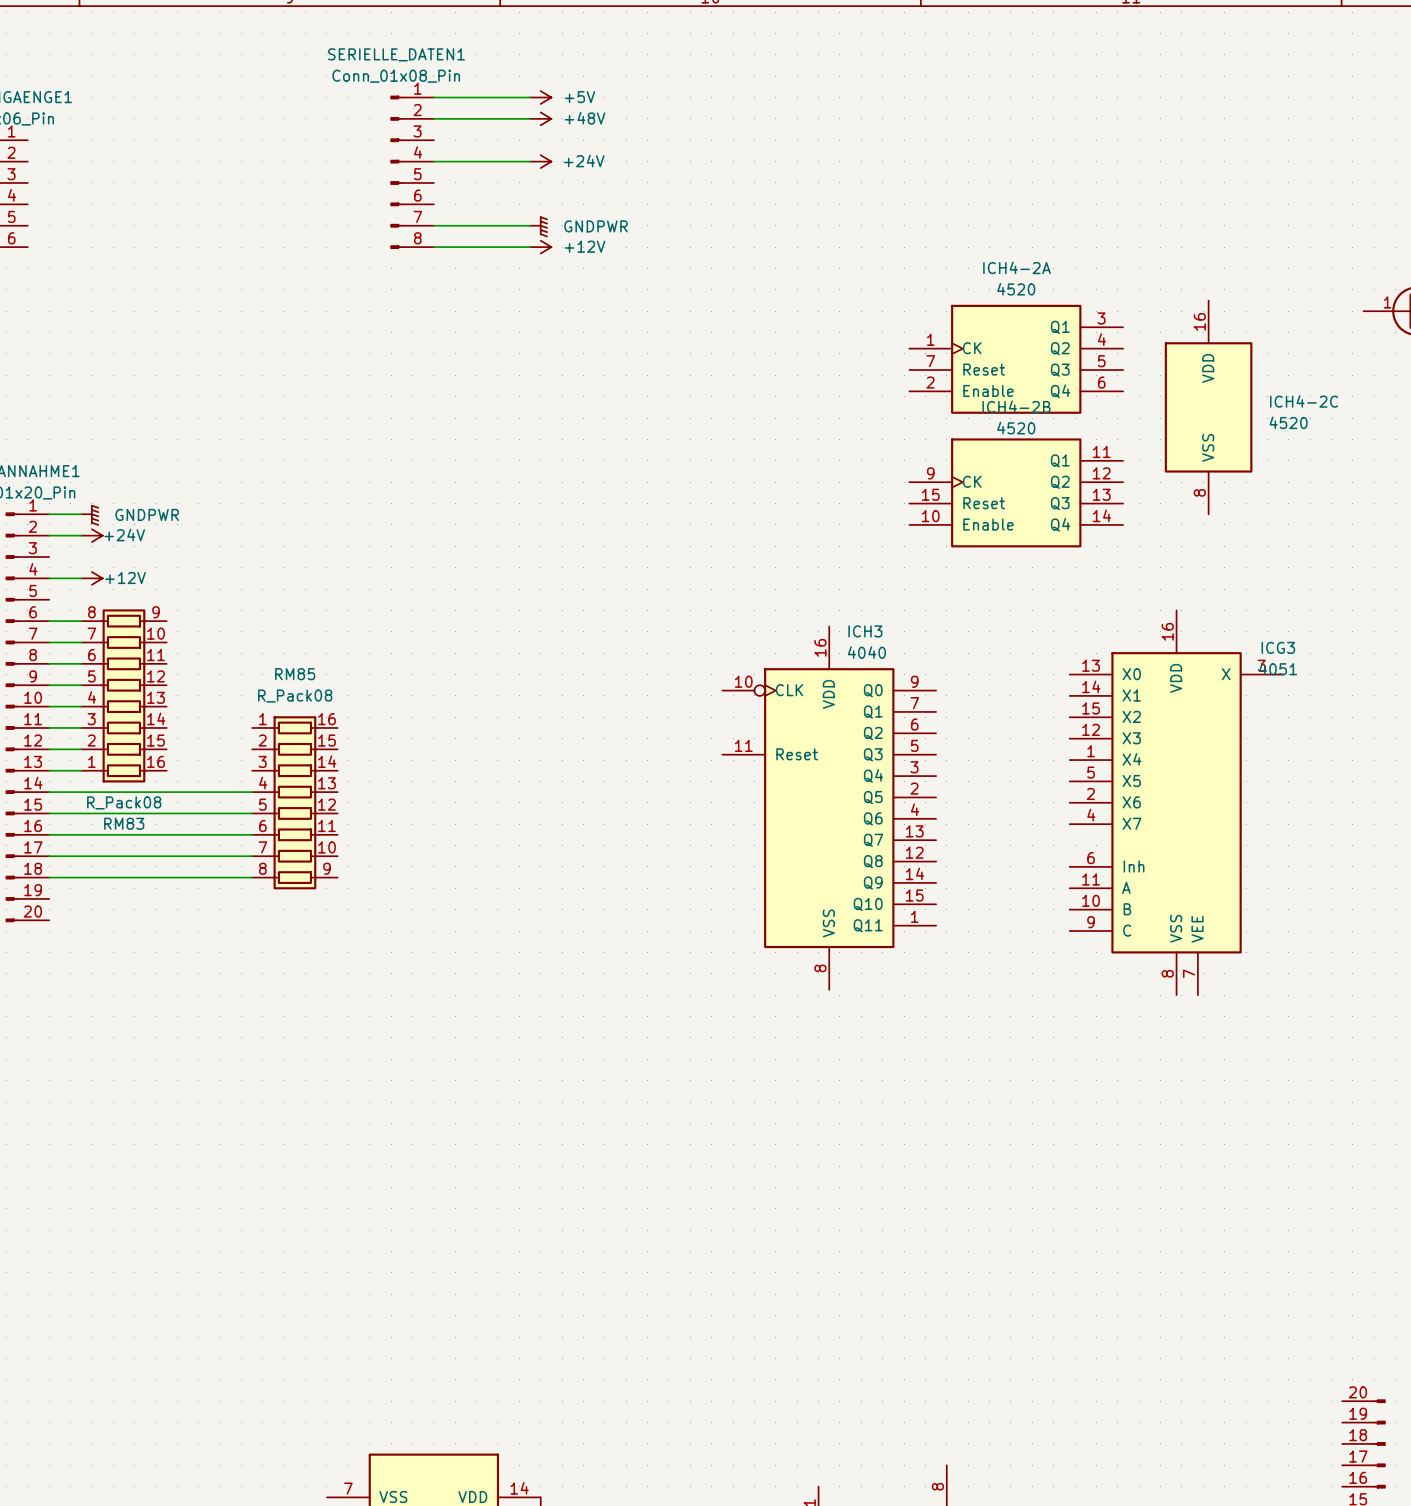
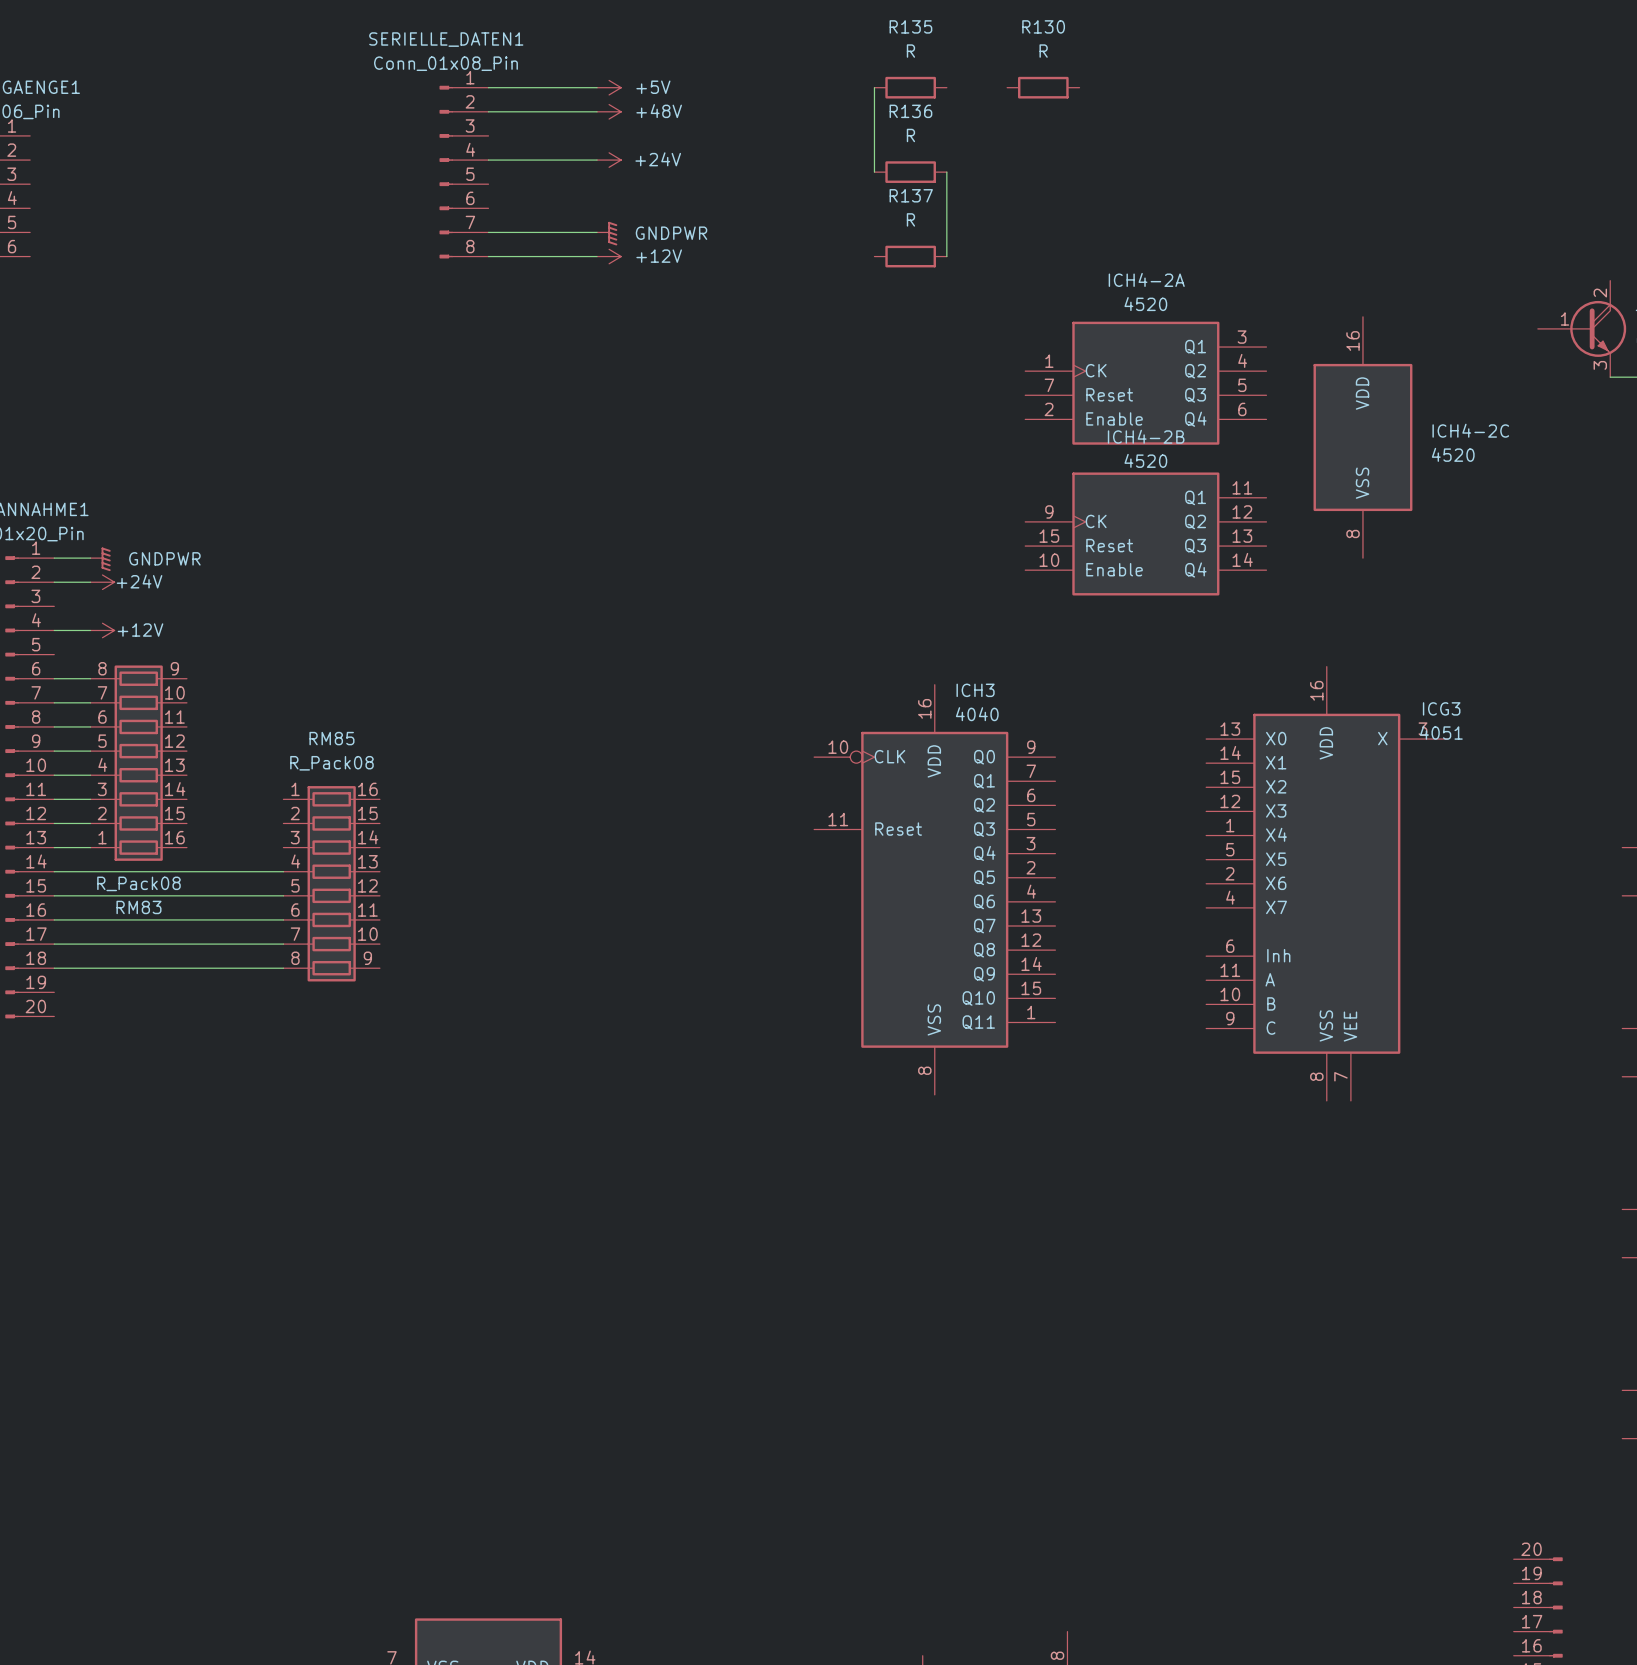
wire: none -> (874, 87) (874, 172)
R135: none -> R (910, 87)
R130: none -> R (1043, 87)
R136: none -> R (910, 172)
wire: none -> (946, 172) (946, 256)
R137: none -> R (910, 256)

